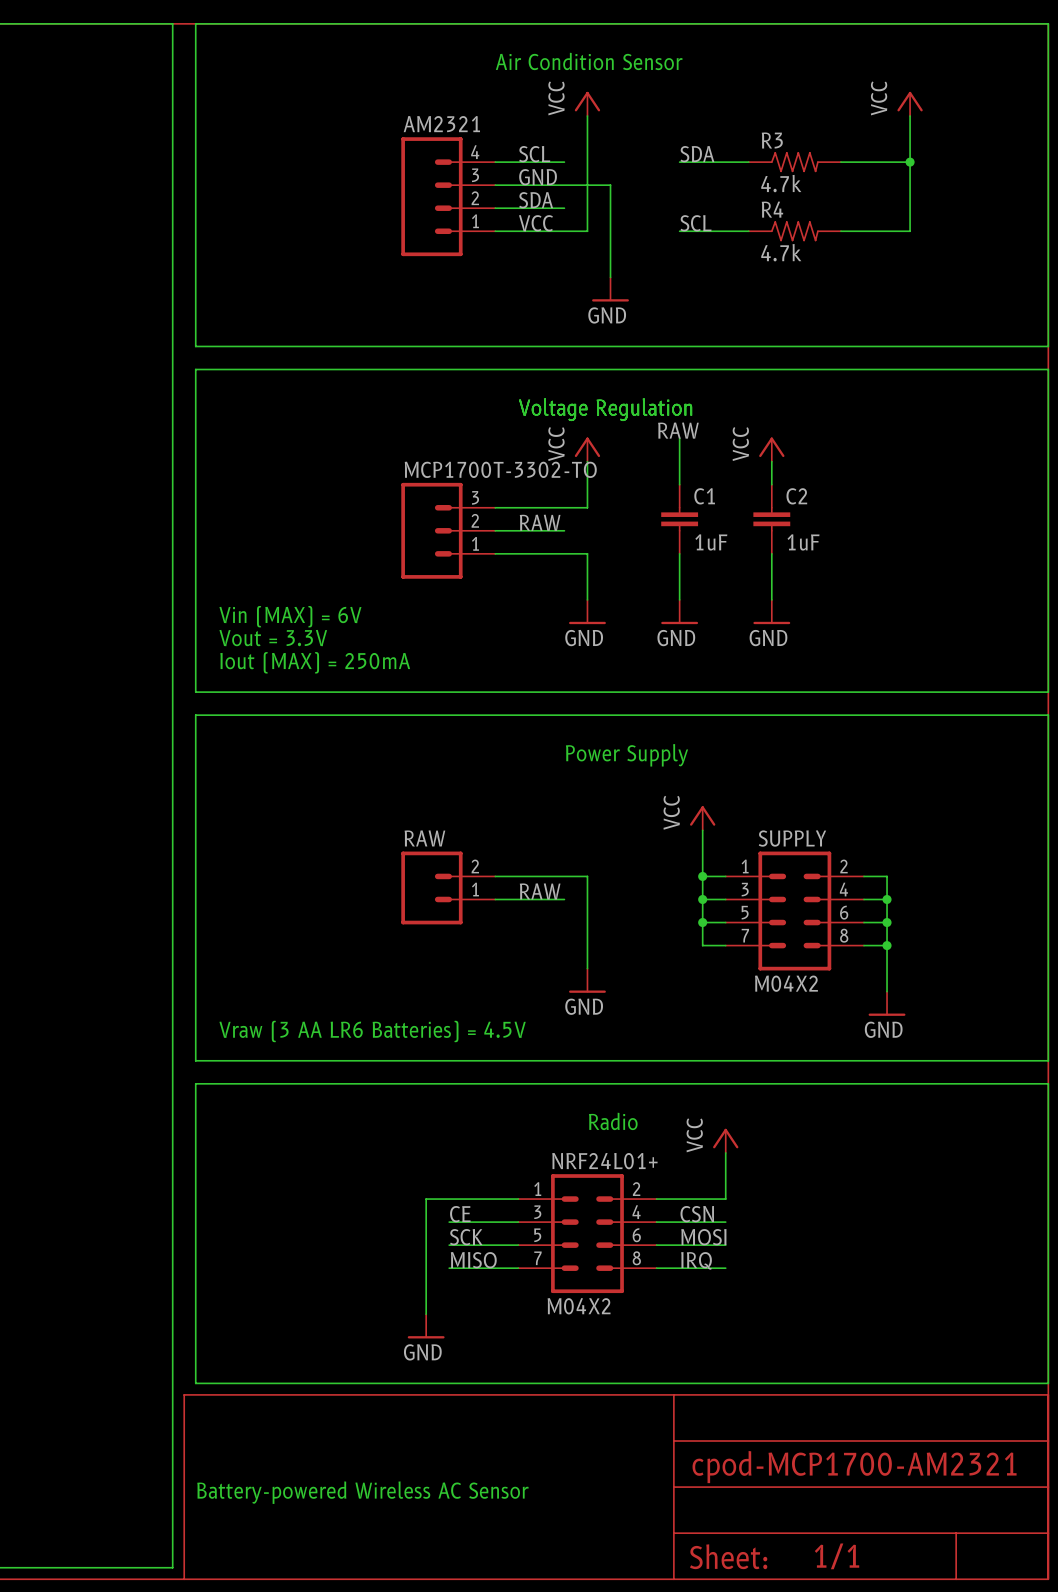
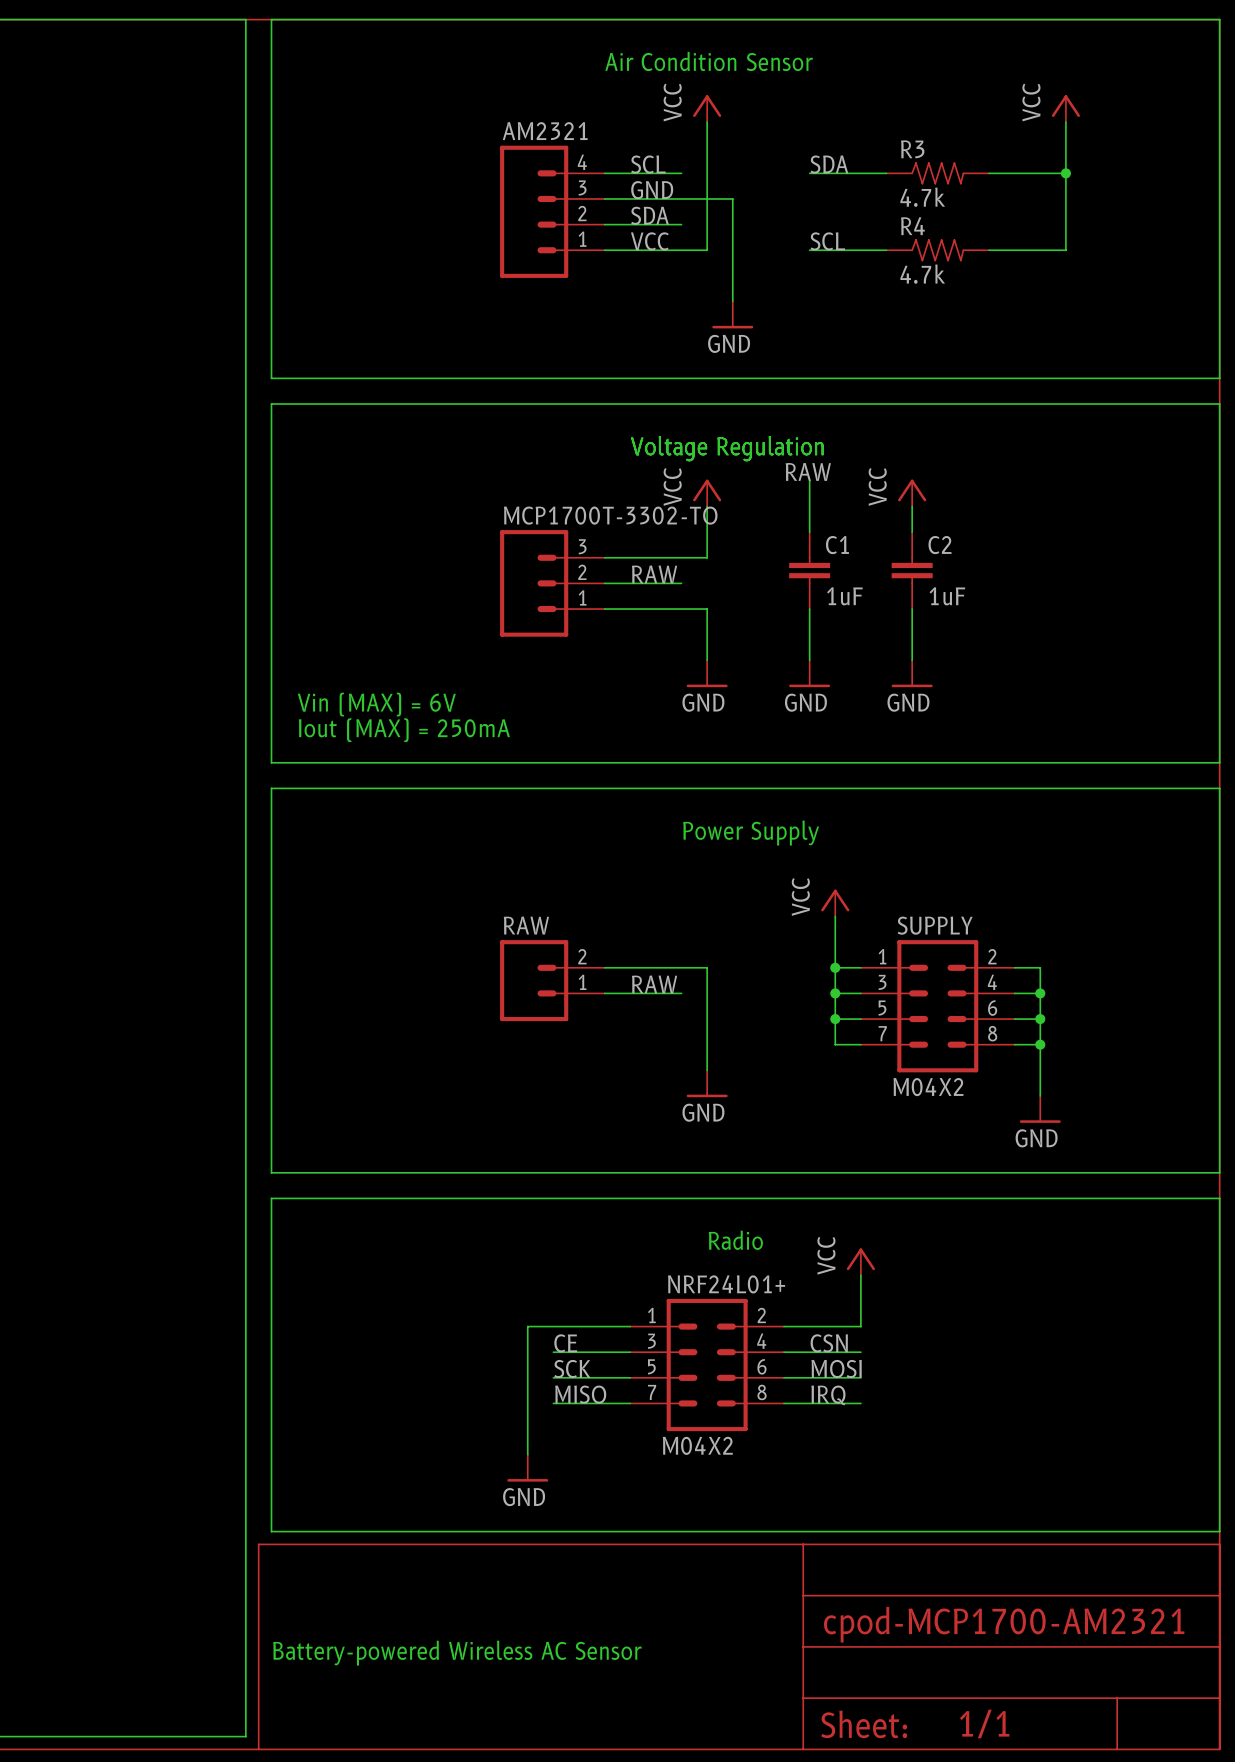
text: Vin (MAX) = 6V (290, 616) -> none
text: Vout = 3.3V (273, 638) -> Vin (MAX) = 6V (376, 704)
text: Vraw (3 AA LR6 Batteries) = 4.5V (372, 1031) -> none

